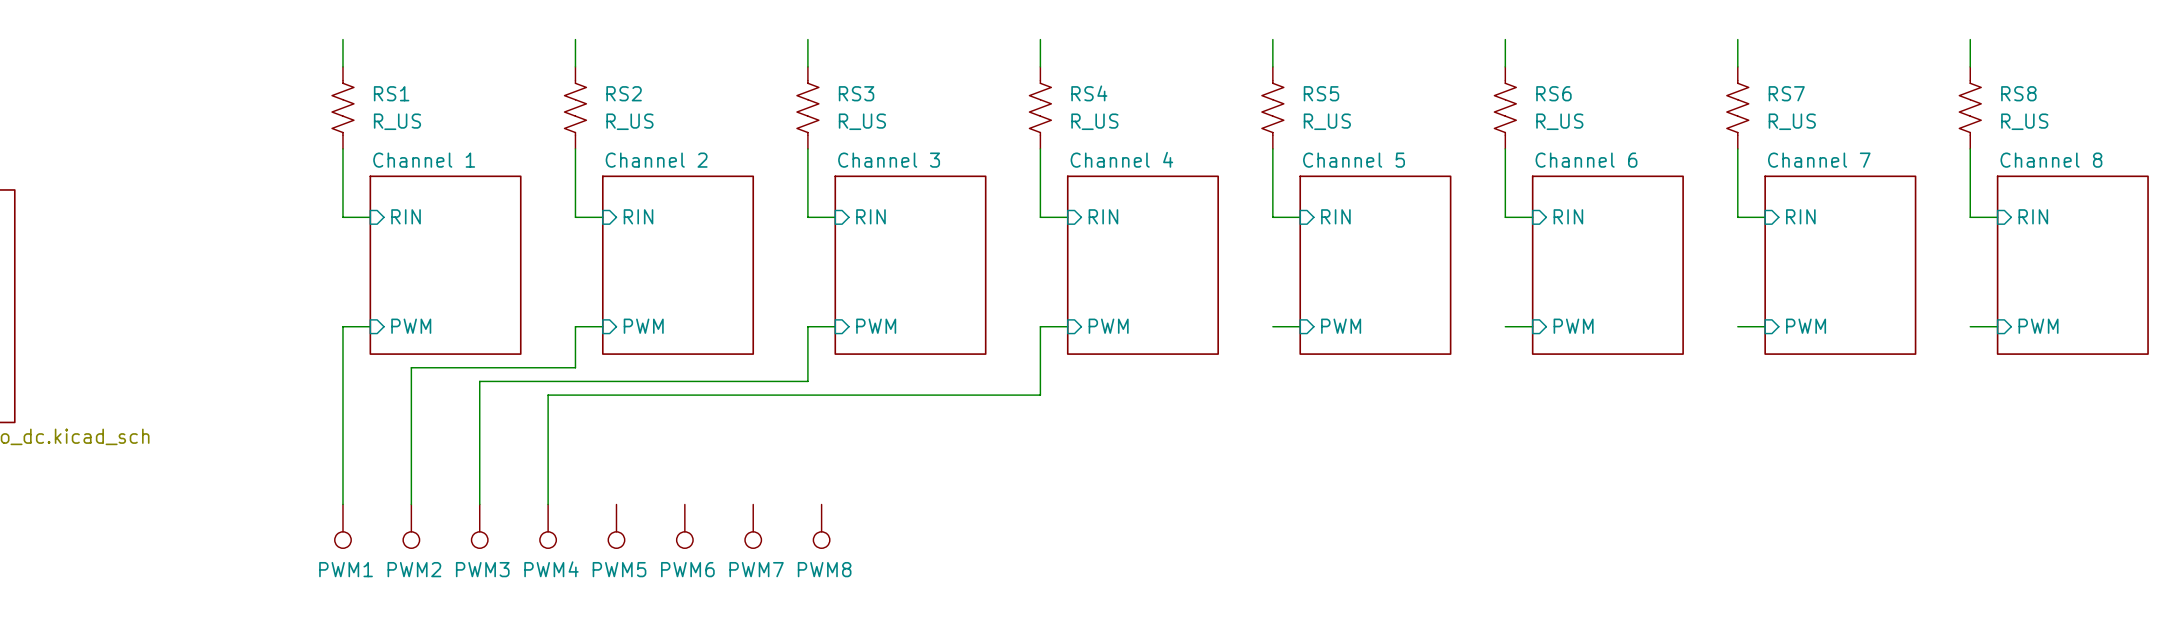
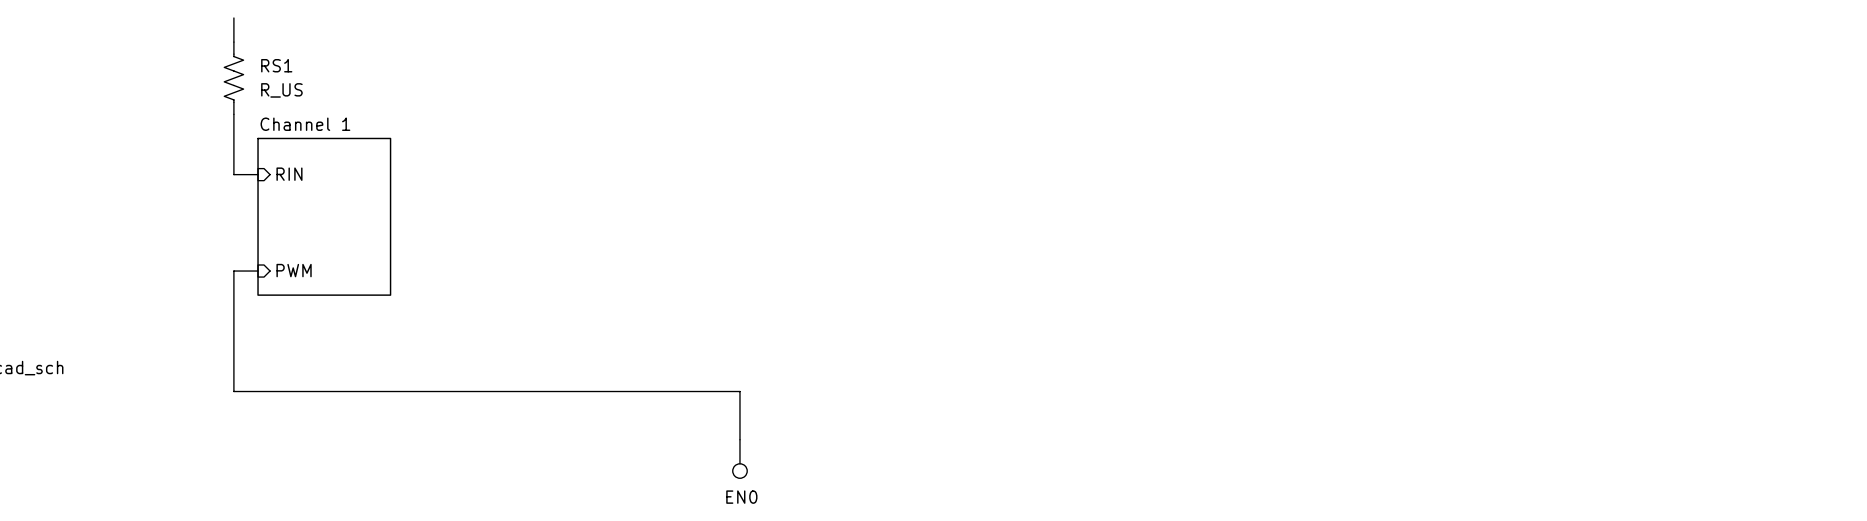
wire: (575, 39) (575, 66) -> none
wire: (807, 39) (807, 66) -> none
wire: (1040, 39) (1040, 66) -> none
wire: (1272, 39) (1272, 66) -> none
wire: (1505, 39) (1505, 66) -> none
wire: (1737, 39) (1737, 66) -> none
wire: (1970, 39) (1970, 66) -> none
RS2: R_US (575, 107) -> none
RS3: R_US (807, 107) -> none
RS4: R_US (1040, 107) -> none
RS5: R_US (1272, 107) -> none
RS6: R_US (1505, 107) -> none
RS7: R_US (1737, 107) -> none
RS8: R_US (1970, 107) -> none
wire: (575, 148) (575, 217) (602, 217) -> none
wire: (807, 148) (807, 217) (835, 217) -> none
wire: (1040, 148) (1040, 217) (1067, 217) -> none
wire: (1272, 148) (1272, 217) (1300, 217) -> none
wire: (1505, 148) (1505, 217) (1532, 217) -> none
wire: (1737, 148) (1737, 217) (1765, 217) -> none
wire: (1970, 148) (1970, 217) (1997, 217) -> none
sheet pin: RIN (638, 216) -> none
sheet pin: RIN (870, 216) -> none
sheet pin: RIN (1103, 216) -> none
sheet pin: RIN (1335, 216) -> none
sheet pin: RIN (1568, 216) -> none
sheet pin: RIN (1800, 216) -> none
sheet pin: RIN (2033, 216) -> none
sheet Channel 2: (678, 265) -> none
sheet Channel 3: (910, 265) -> none
sheet Channel 4: (1142, 265) -> none
sheet Channel 5: (1375, 265) -> none
sheet Channel 6: (1607, 265) -> none
sheet Channel 7: (1840, 265) -> none
sheet Channel 8: (2072, 265) -> none
wire: (602, 326) (575, 326) (575, 367) (411, 367) (411, 504) -> none
sheet pin: PWM (643, 326) -> none
wire: (835, 326) (807, 326) (807, 381) (479, 381) (479, 504) -> none
sheet pin: PWM (876, 326) -> none
wire: (1067, 326) (1040, 326) (1040, 395) (548, 395) (548, 504) -> none
sheet pin: PWM (1108, 326) -> none
wire: (1272, 326) (1300, 326) -> none
sheet pin: PWM (1341, 326) -> none
wire: (1505, 326) (1532, 326) -> none
sheet pin: PWM (1573, 326) -> none
wire: (1737, 326) (1765, 326) -> none
sheet pin: PWM (1806, 326) -> none
wire: (1970, 326) (1997, 326) -> none
sheet pin: PWM (2038, 326) -> none
wire: (342, 463) (342, 504) -> (233, 391) (739, 391) (739, 439)
PWM1: (342, 526) -> none
PWM2: (411, 526) -> none
PWM3: (479, 526) -> none
PWM4: (548, 526) -> none
PWM5: (616, 526) -> none
PWM6: (684, 526) -> none
PWM7: (753, 526) -> none
PWM8: (821, 526) -> none
EN0: none -> (739, 458)

